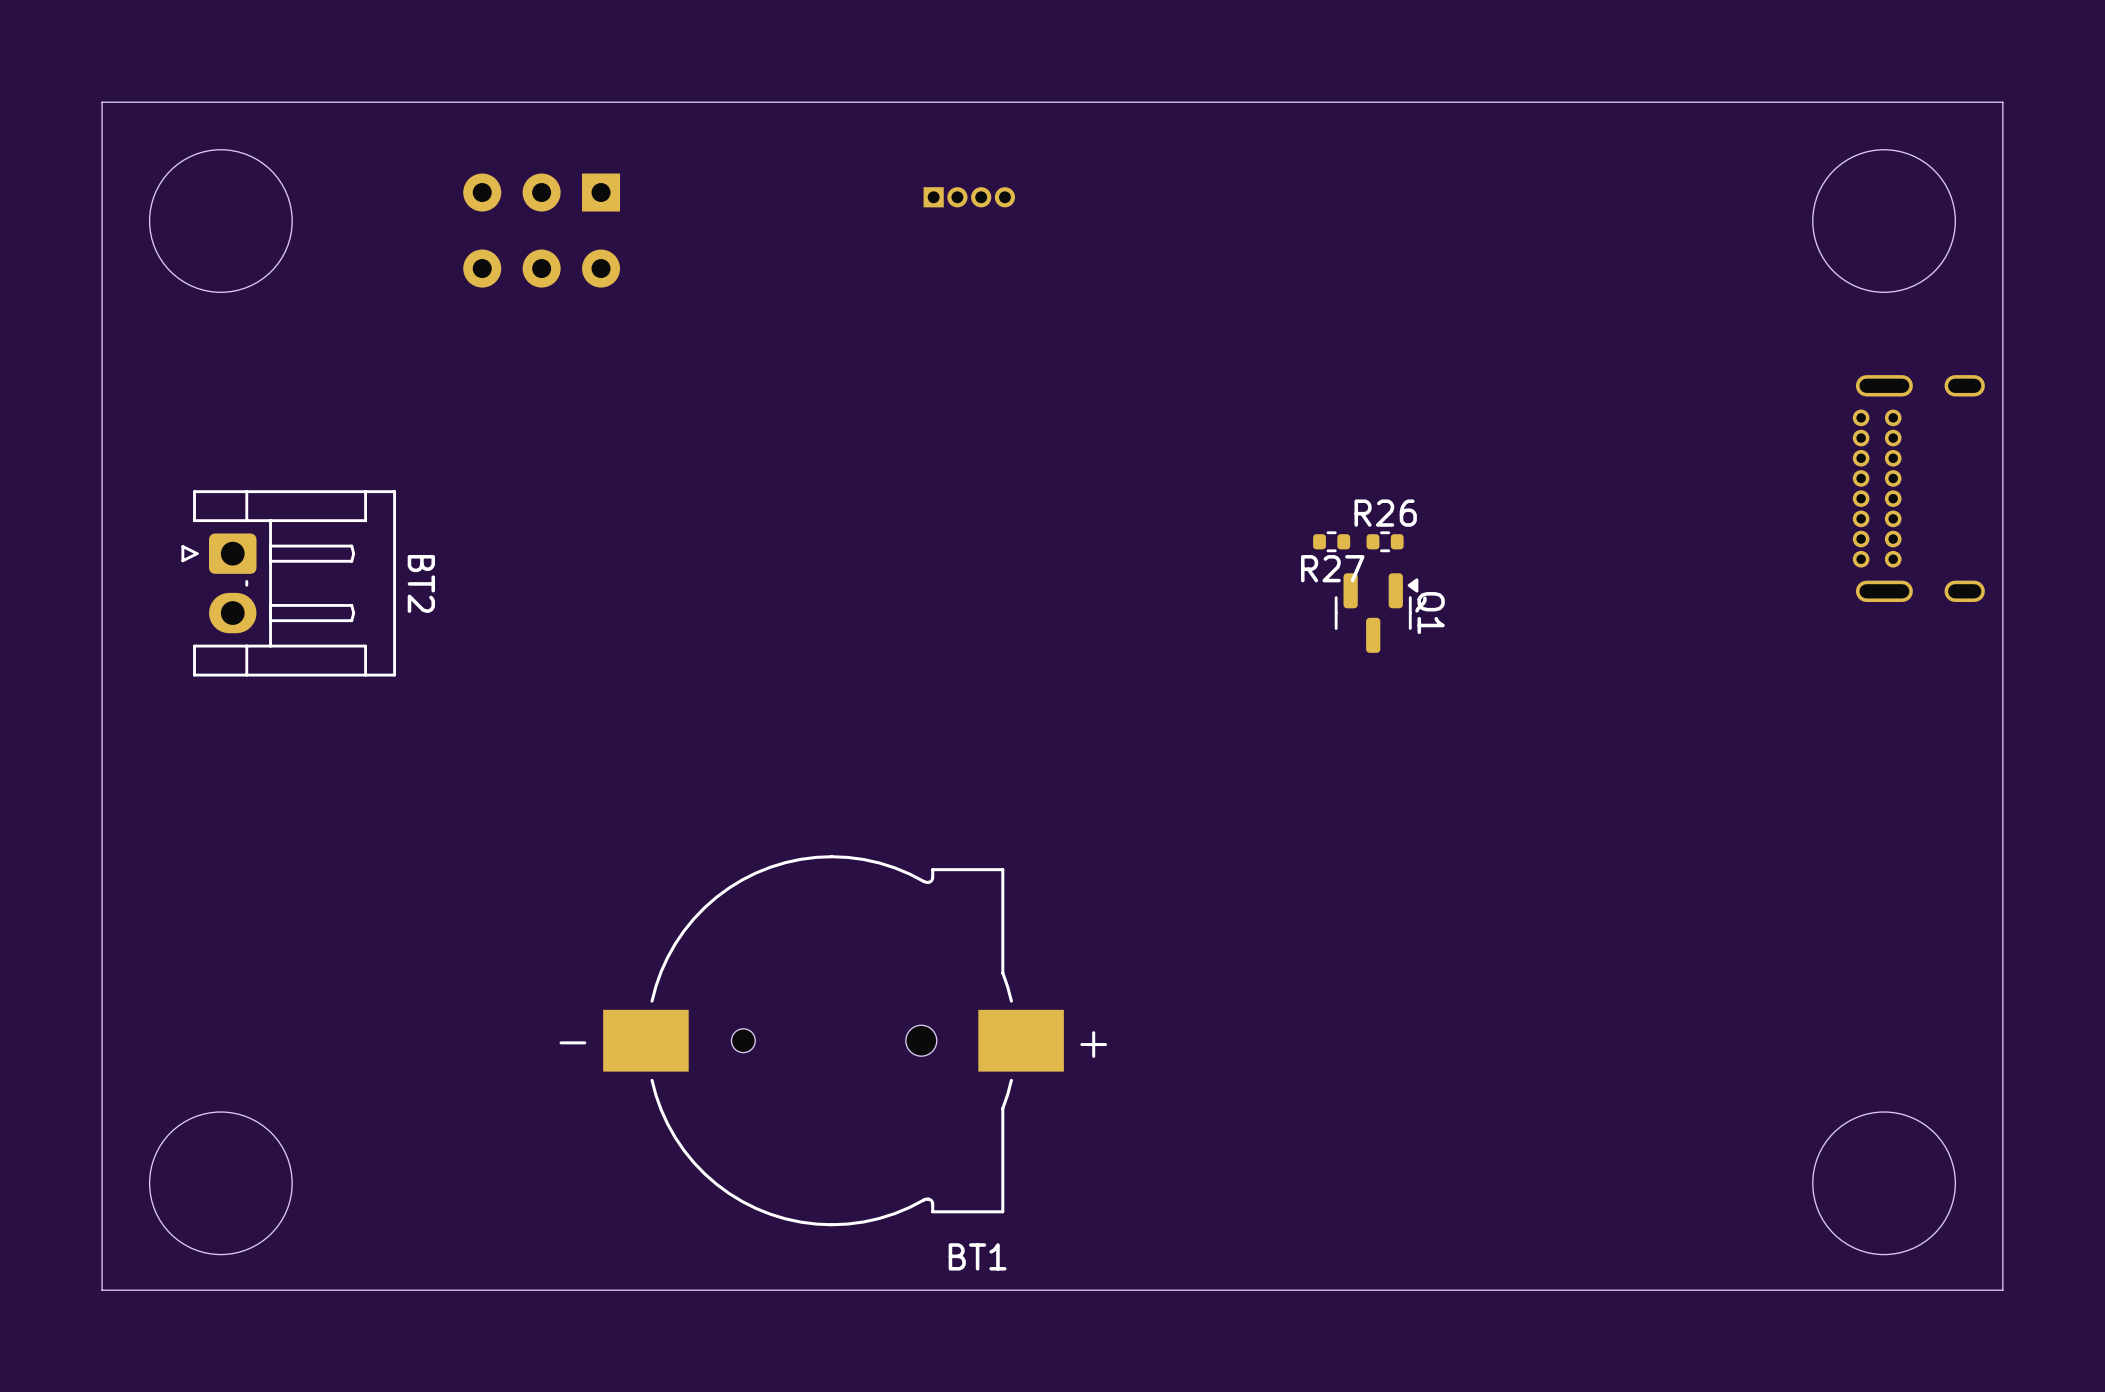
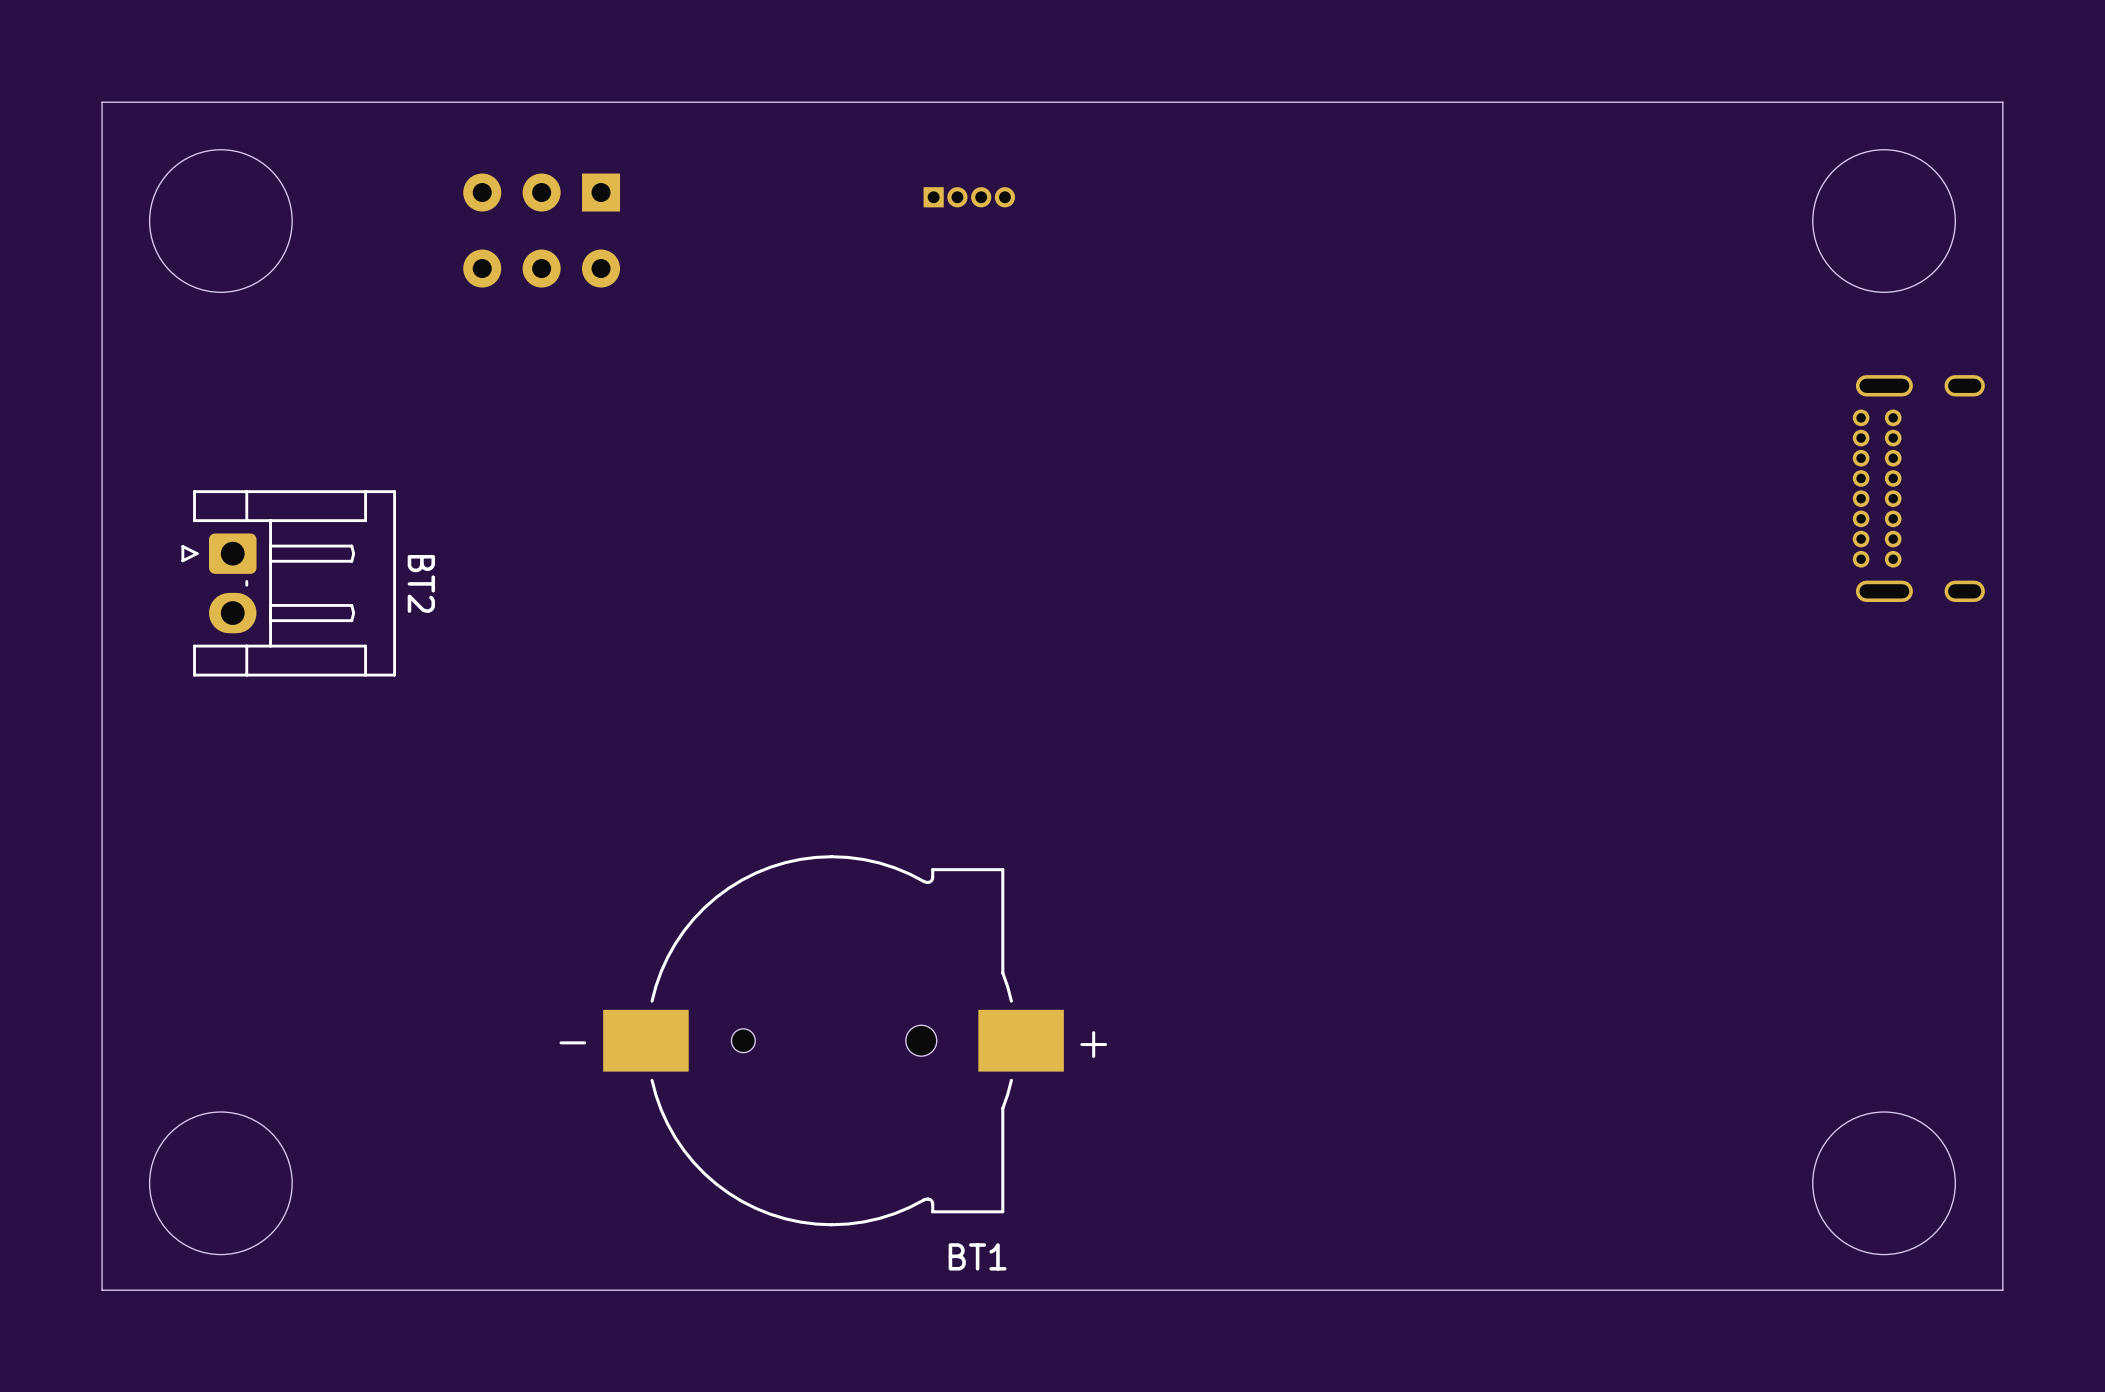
R27: (1331, 541) -> none
R26: (1385, 541) -> none
Q1: (1376, 613) -> none

